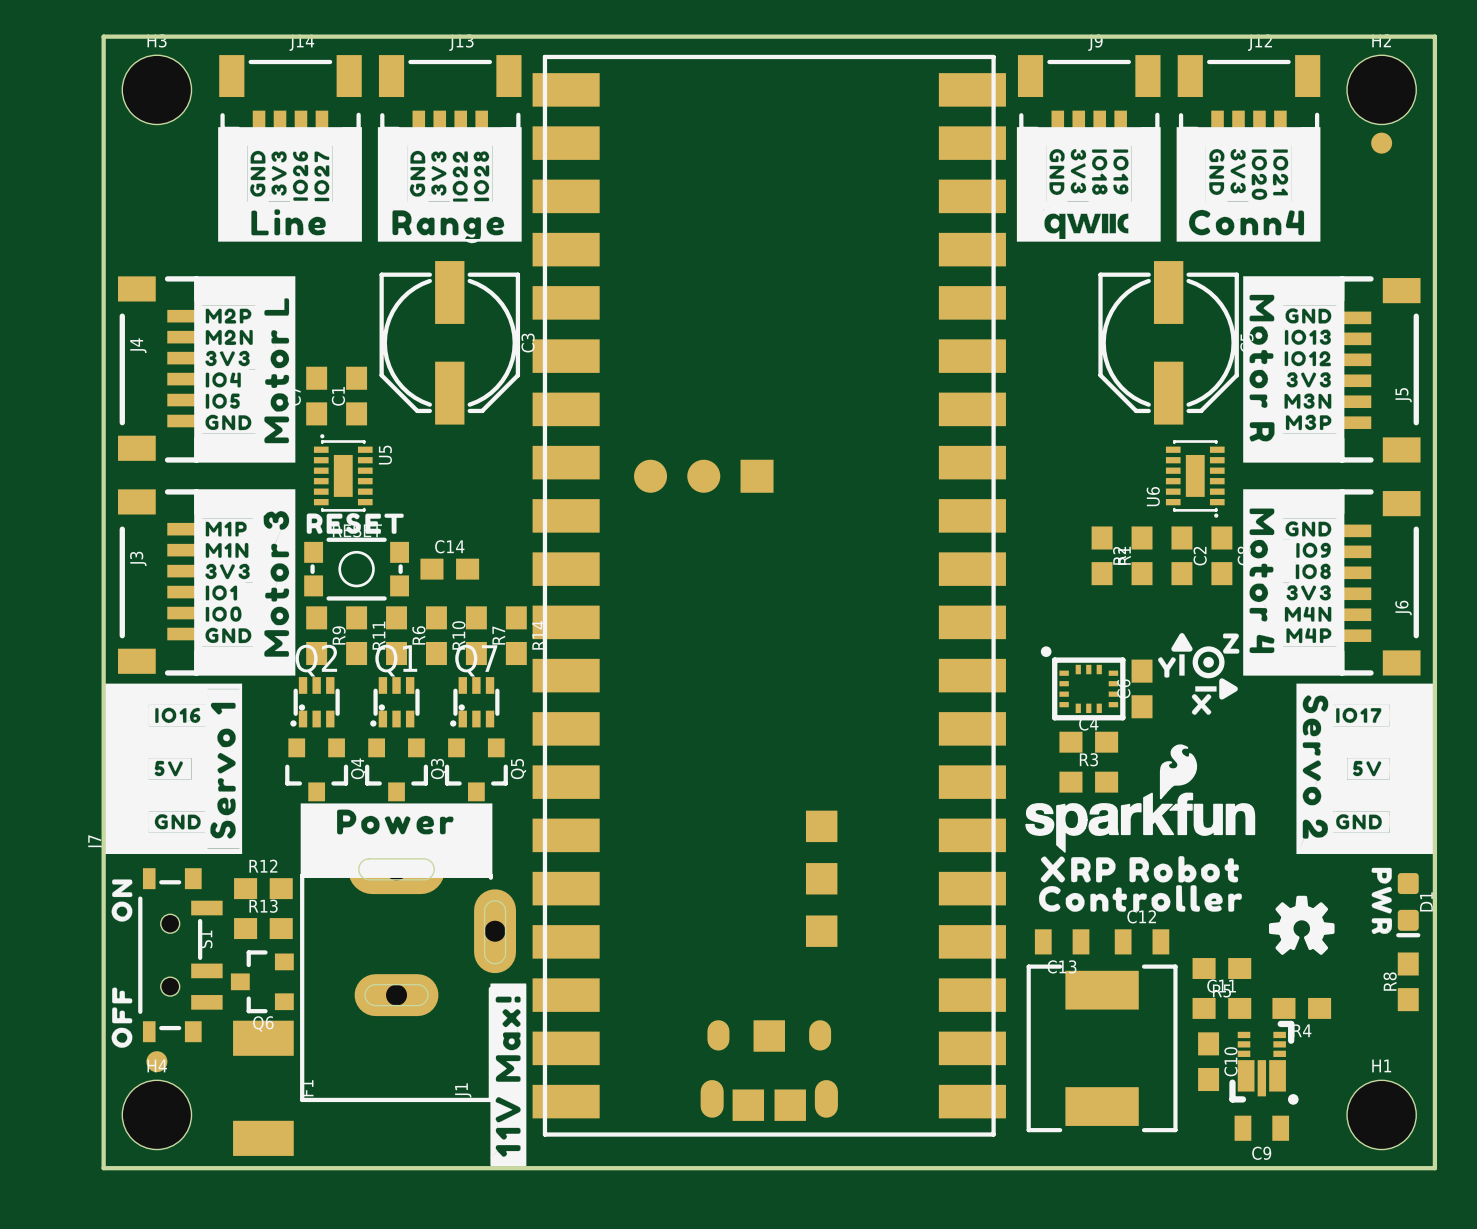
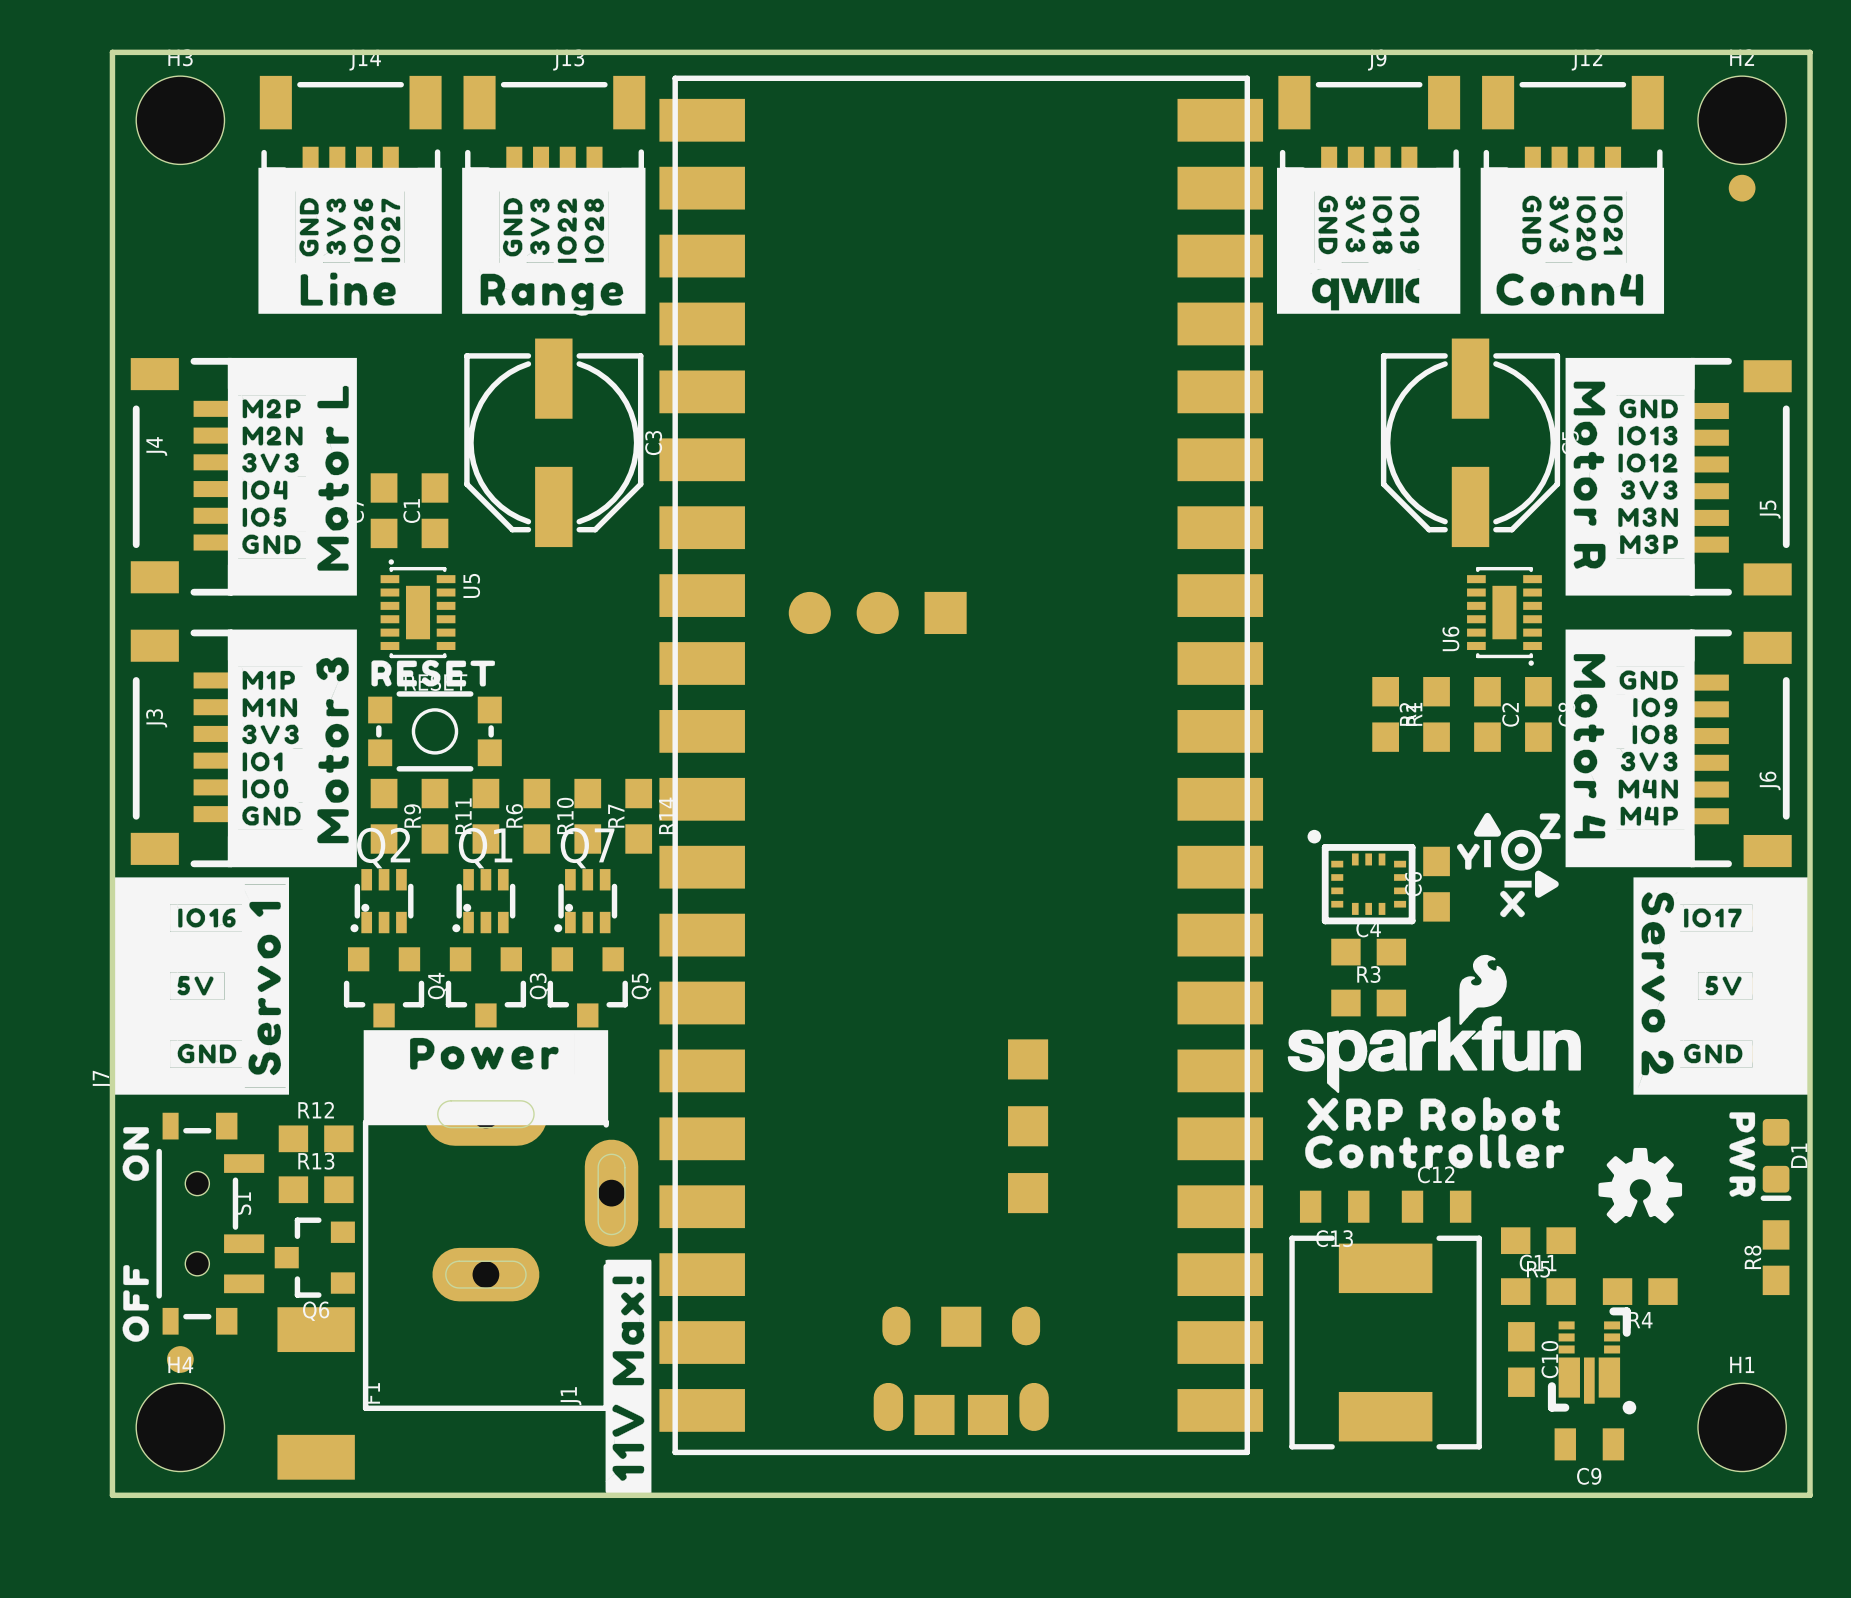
C14: (449, 569) -> none

